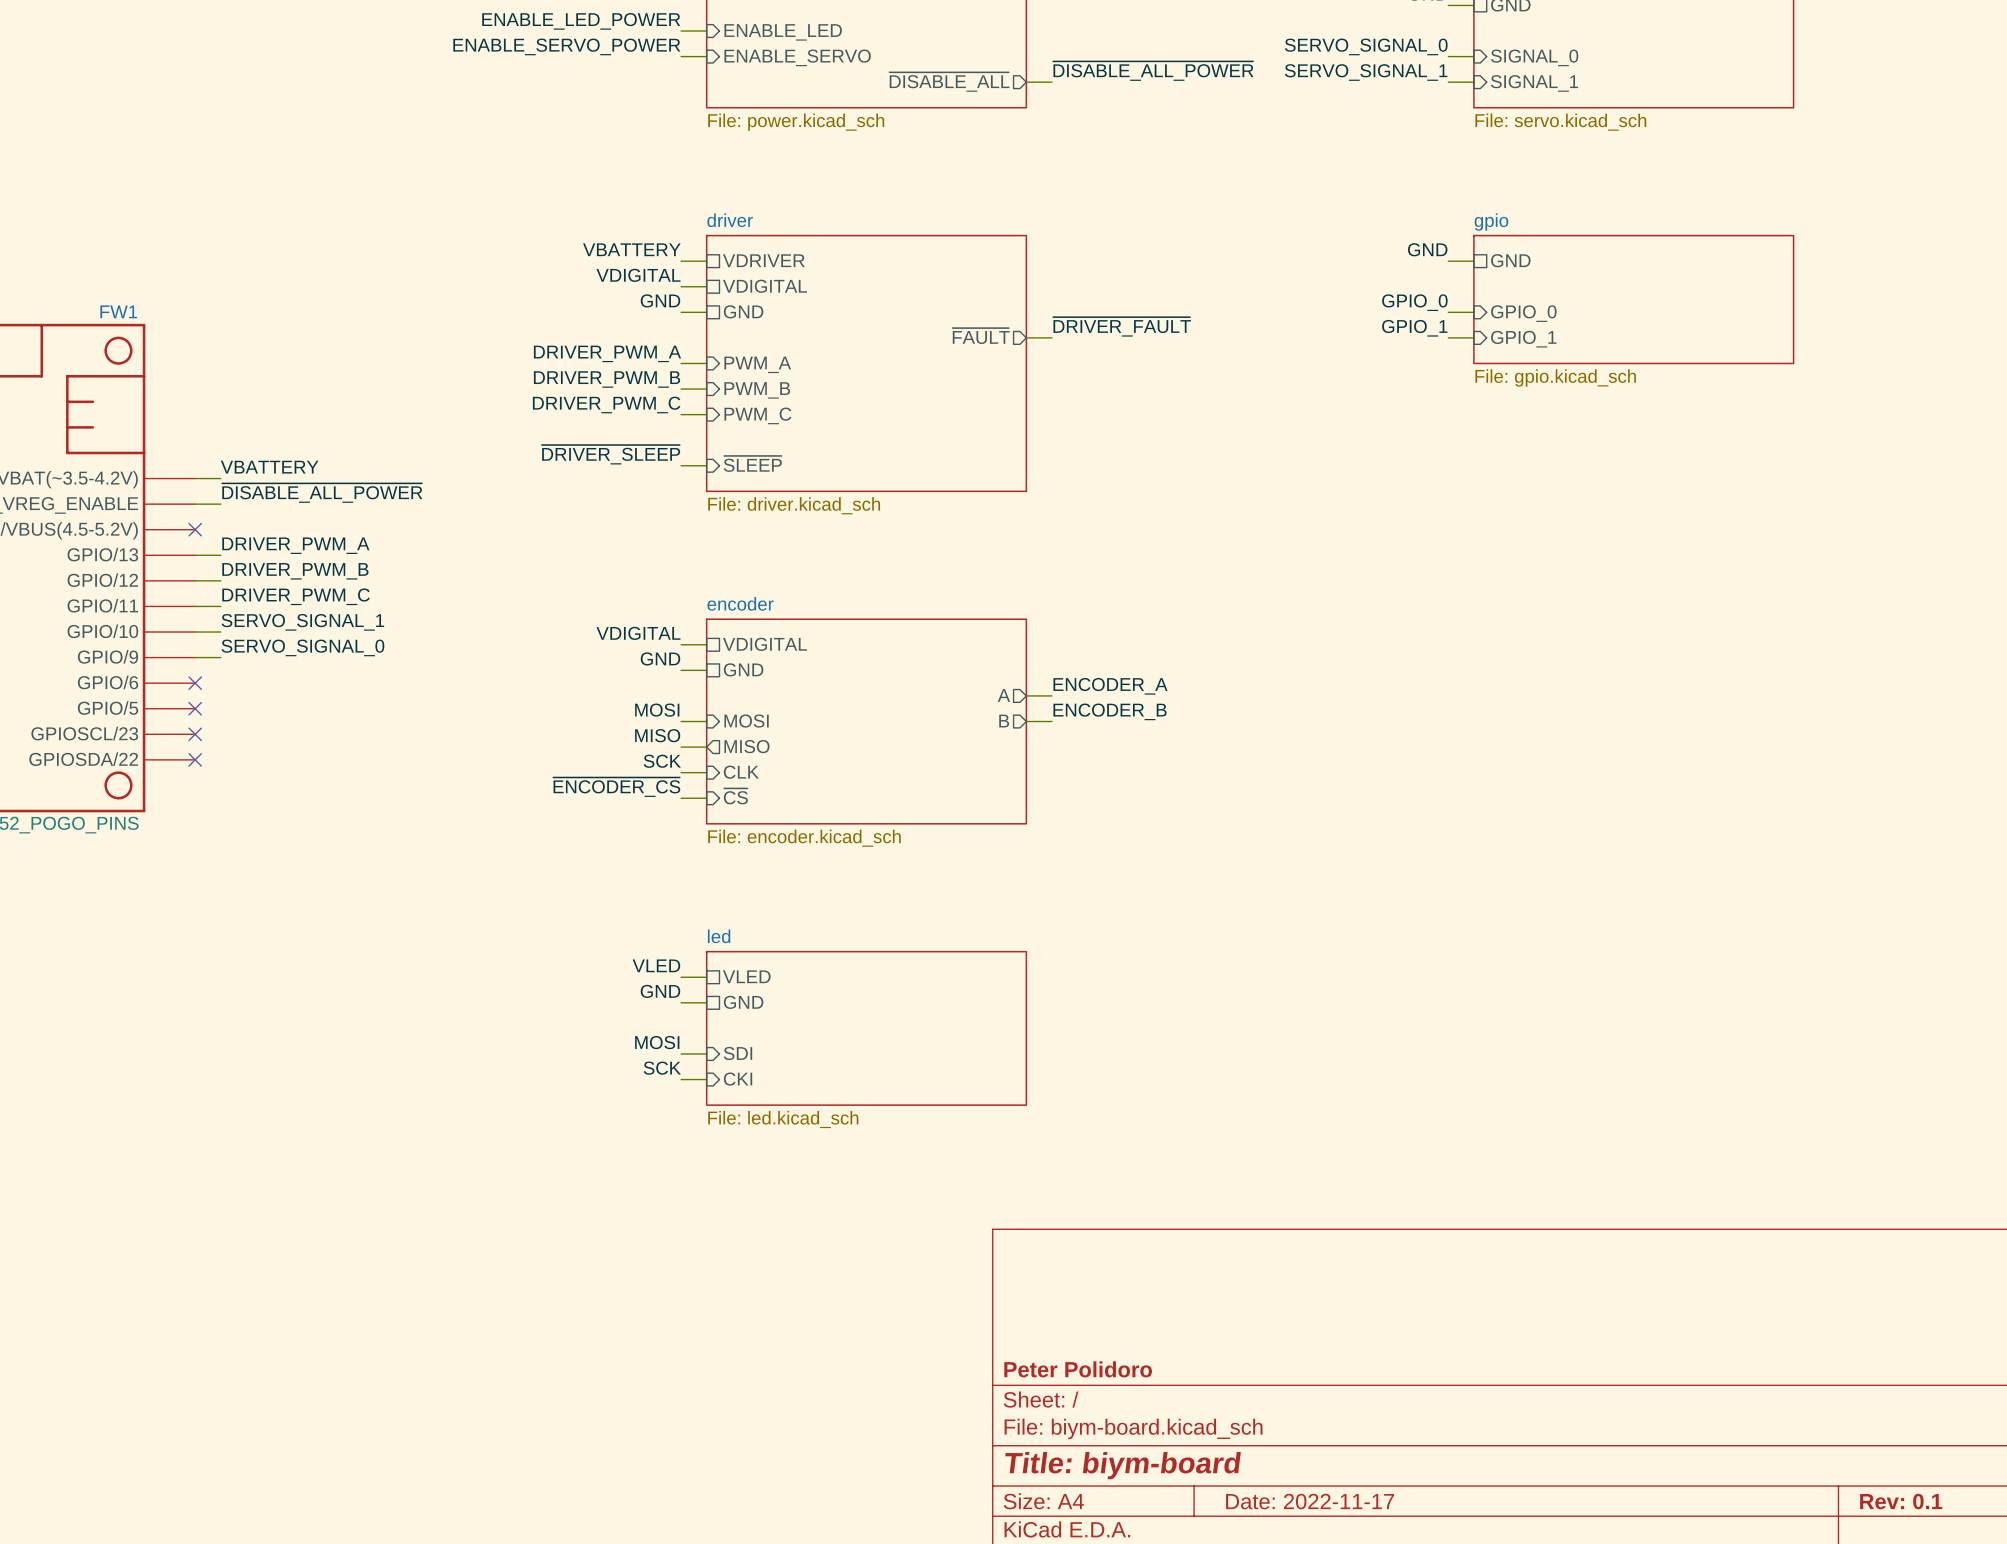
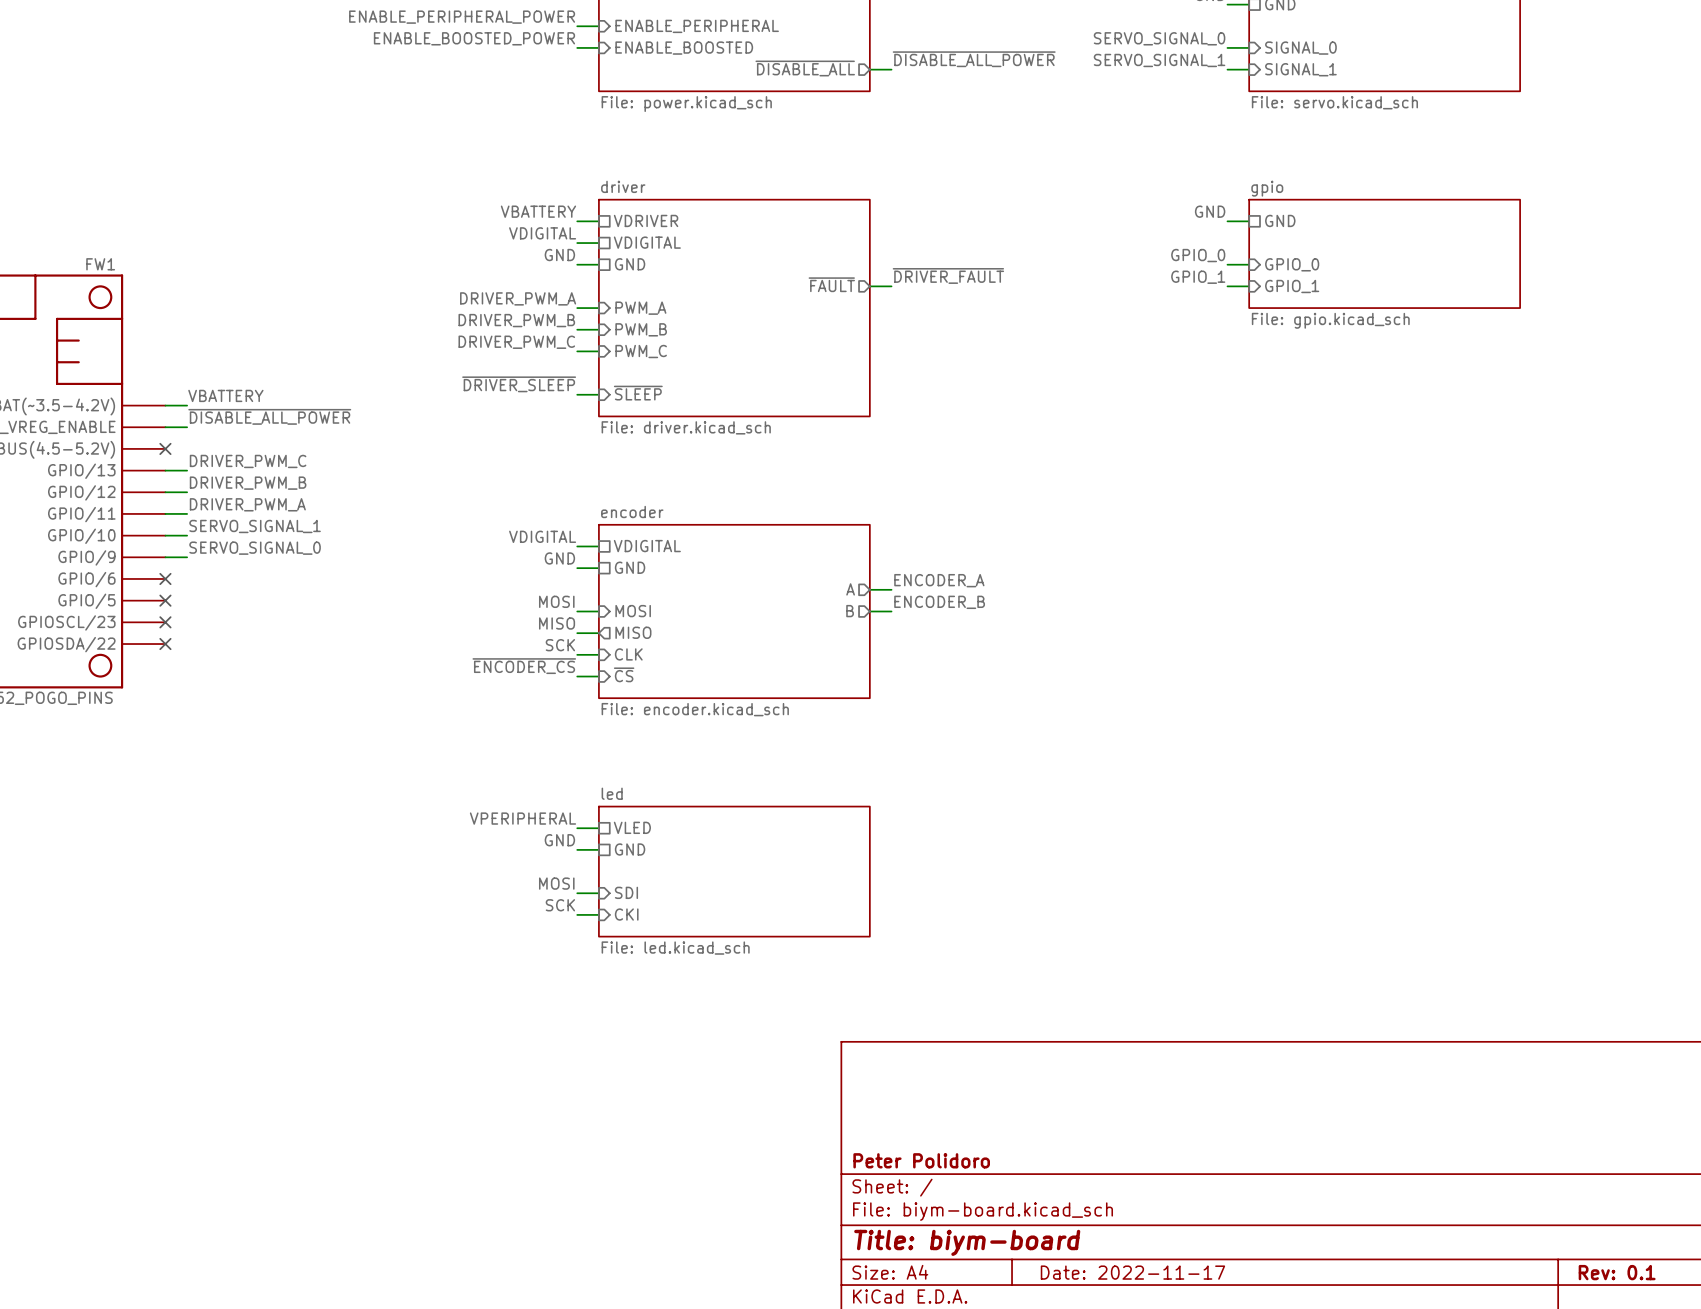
label: ENABLE_LED_POWER (581, 21) -> ENABLE_PERIPHERAL_POWER (462, 17)
sheet pin: ENABLE_LED (783, 32) -> ENABLE_PERIPHERAL (697, 26)
label: ENABLE_SERVO_POWER (566, 46) -> ENABLE_BOOSTED_POWER (474, 38)
sheet pin: ENABLE_SERVO (797, 57) -> ENABLE_BOOSTED (684, 48)
label: DRIVER_PWM_A (295, 545) -> DRIVER_PWM_C (248, 461)
label: DRIVER_PWM_C (296, 596) -> DRIVER_PWM_A (247, 504)
label: VLED (656, 965) -> VPERIPHERAL (522, 818)

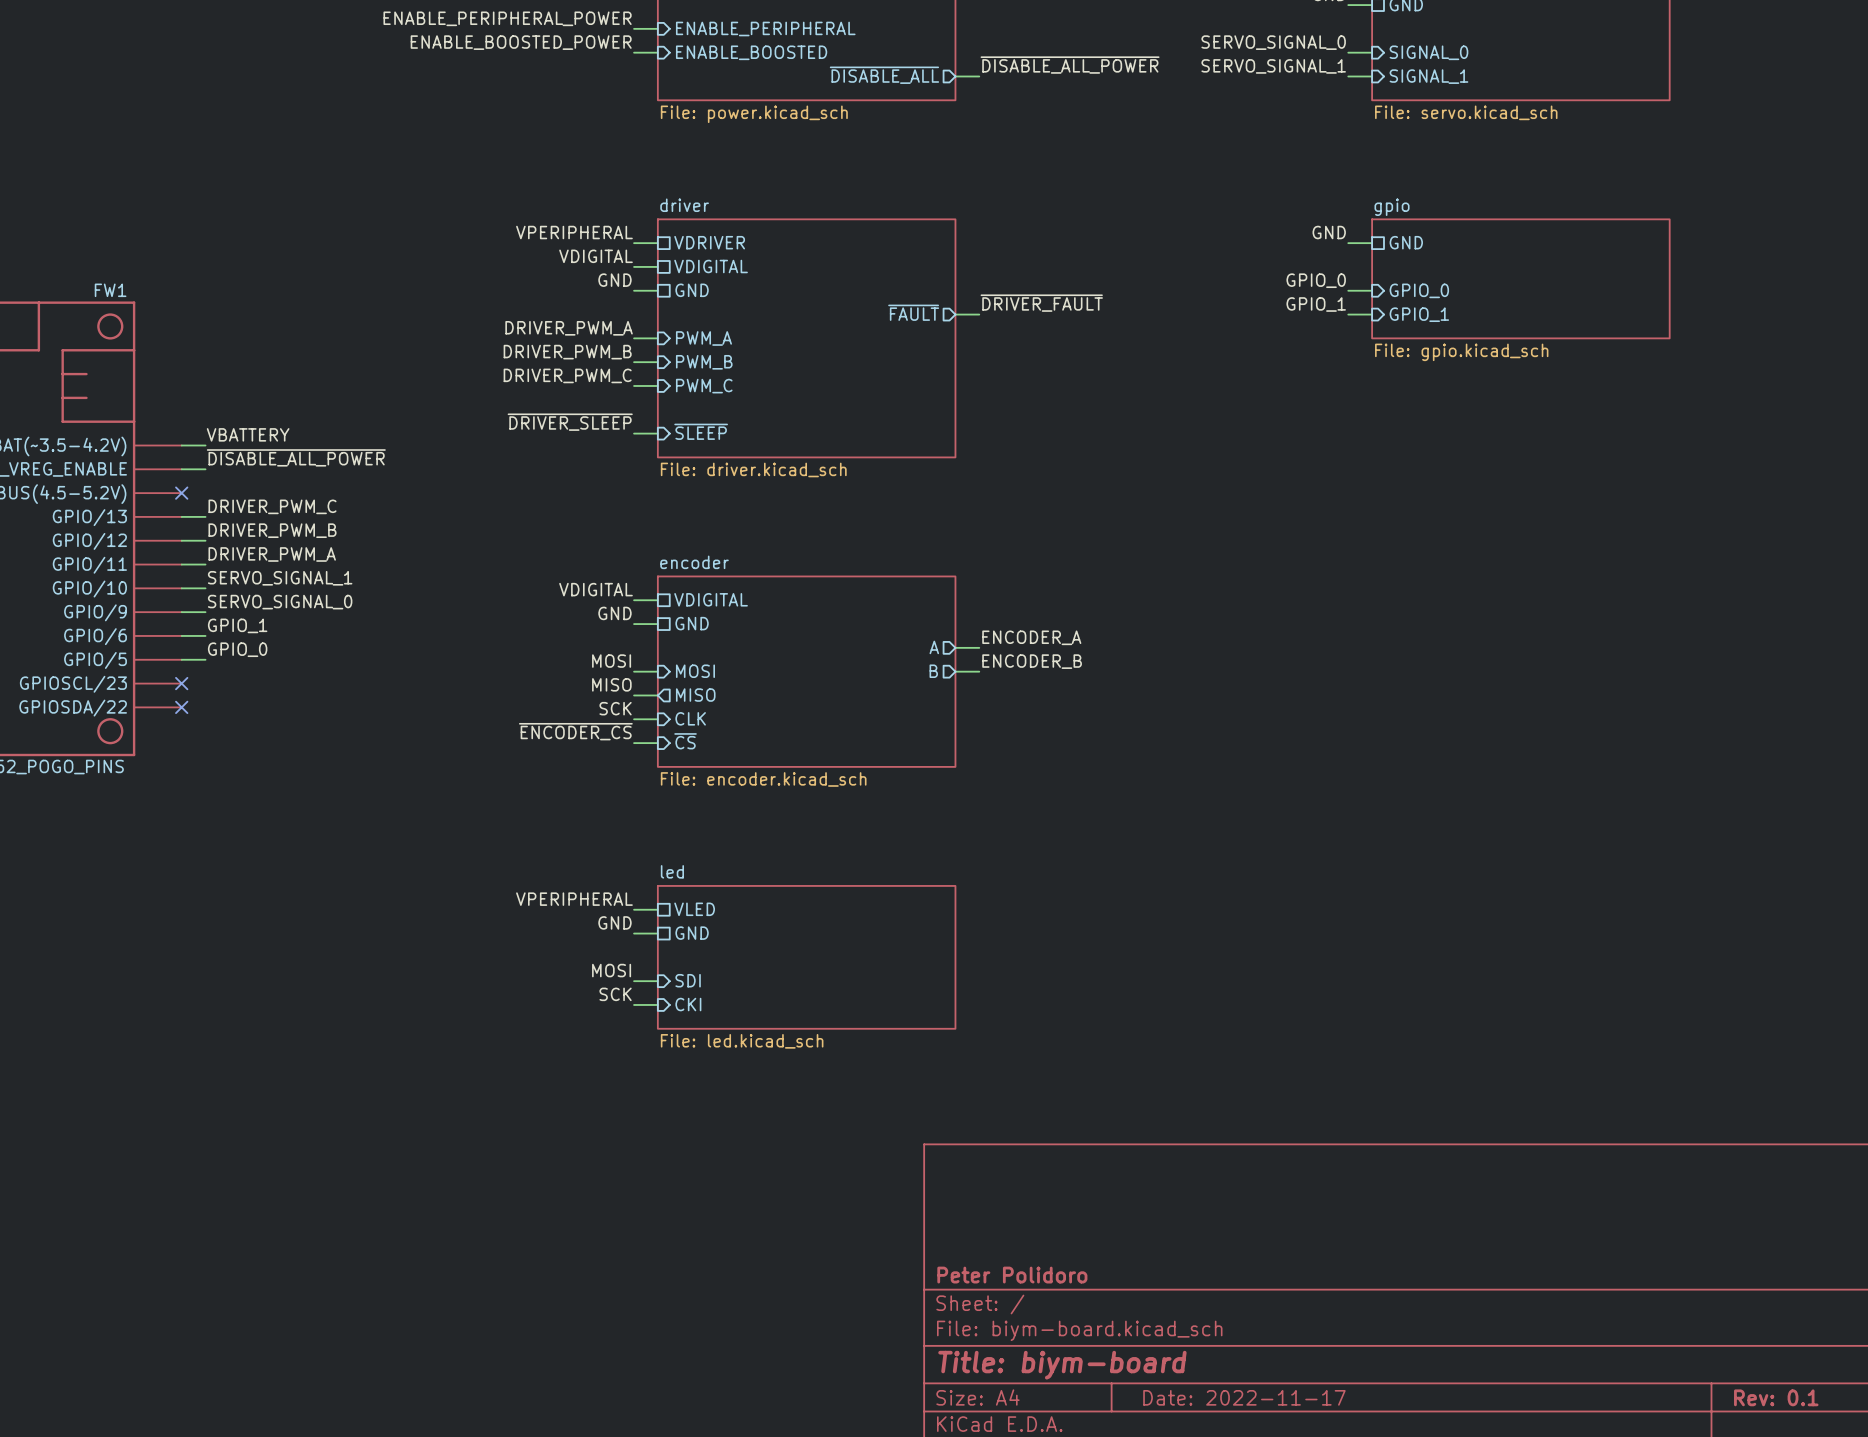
label: VBATTERY (538, 211) -> VPERIPHERAL (574, 232)
label: none -> GPIO_1 (237, 625)
wire: none -> (181, 635) (205, 635)
no-connect mark: (165, 578) -> none
label: none -> GPIO_0 (237, 649)
wire: none -> (181, 659) (205, 659)
no-connect mark: (165, 600) -> none

